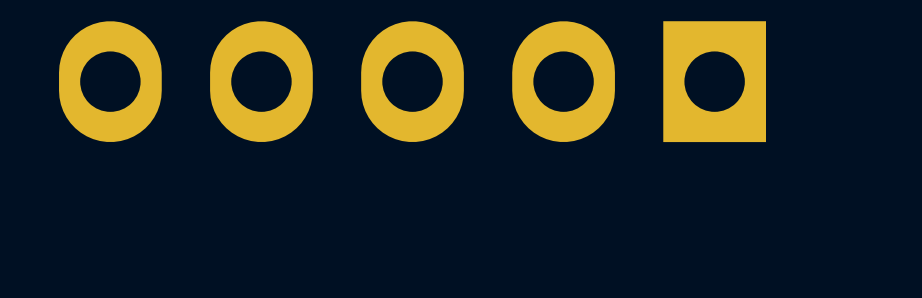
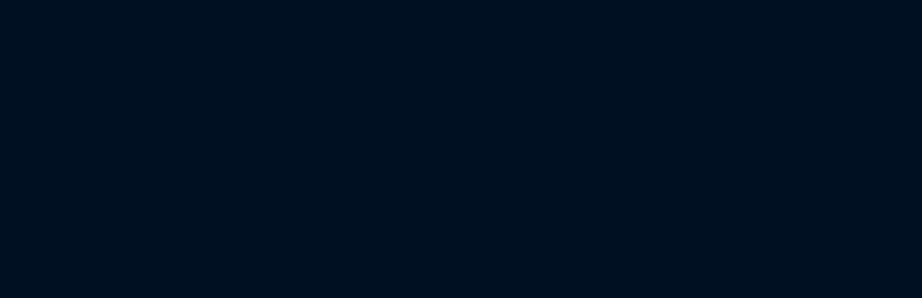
part: (412, 81) -> none

